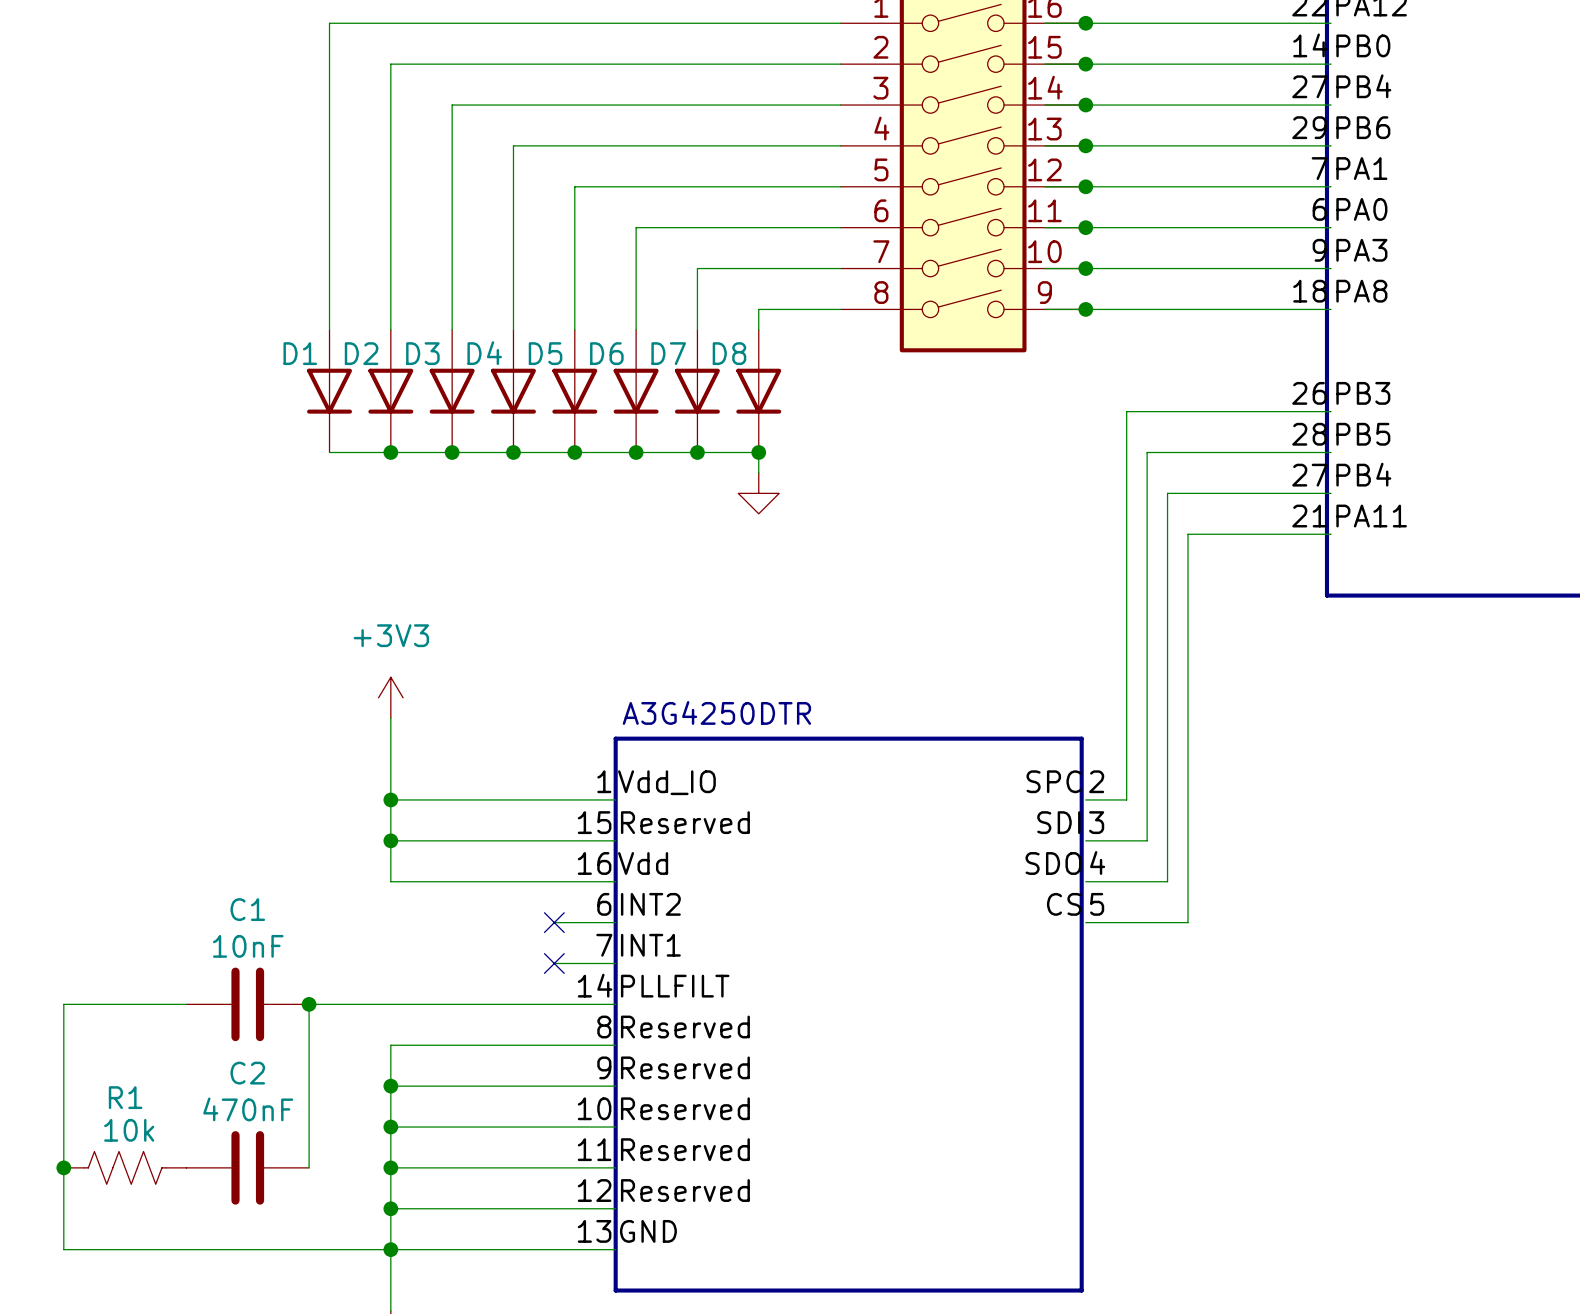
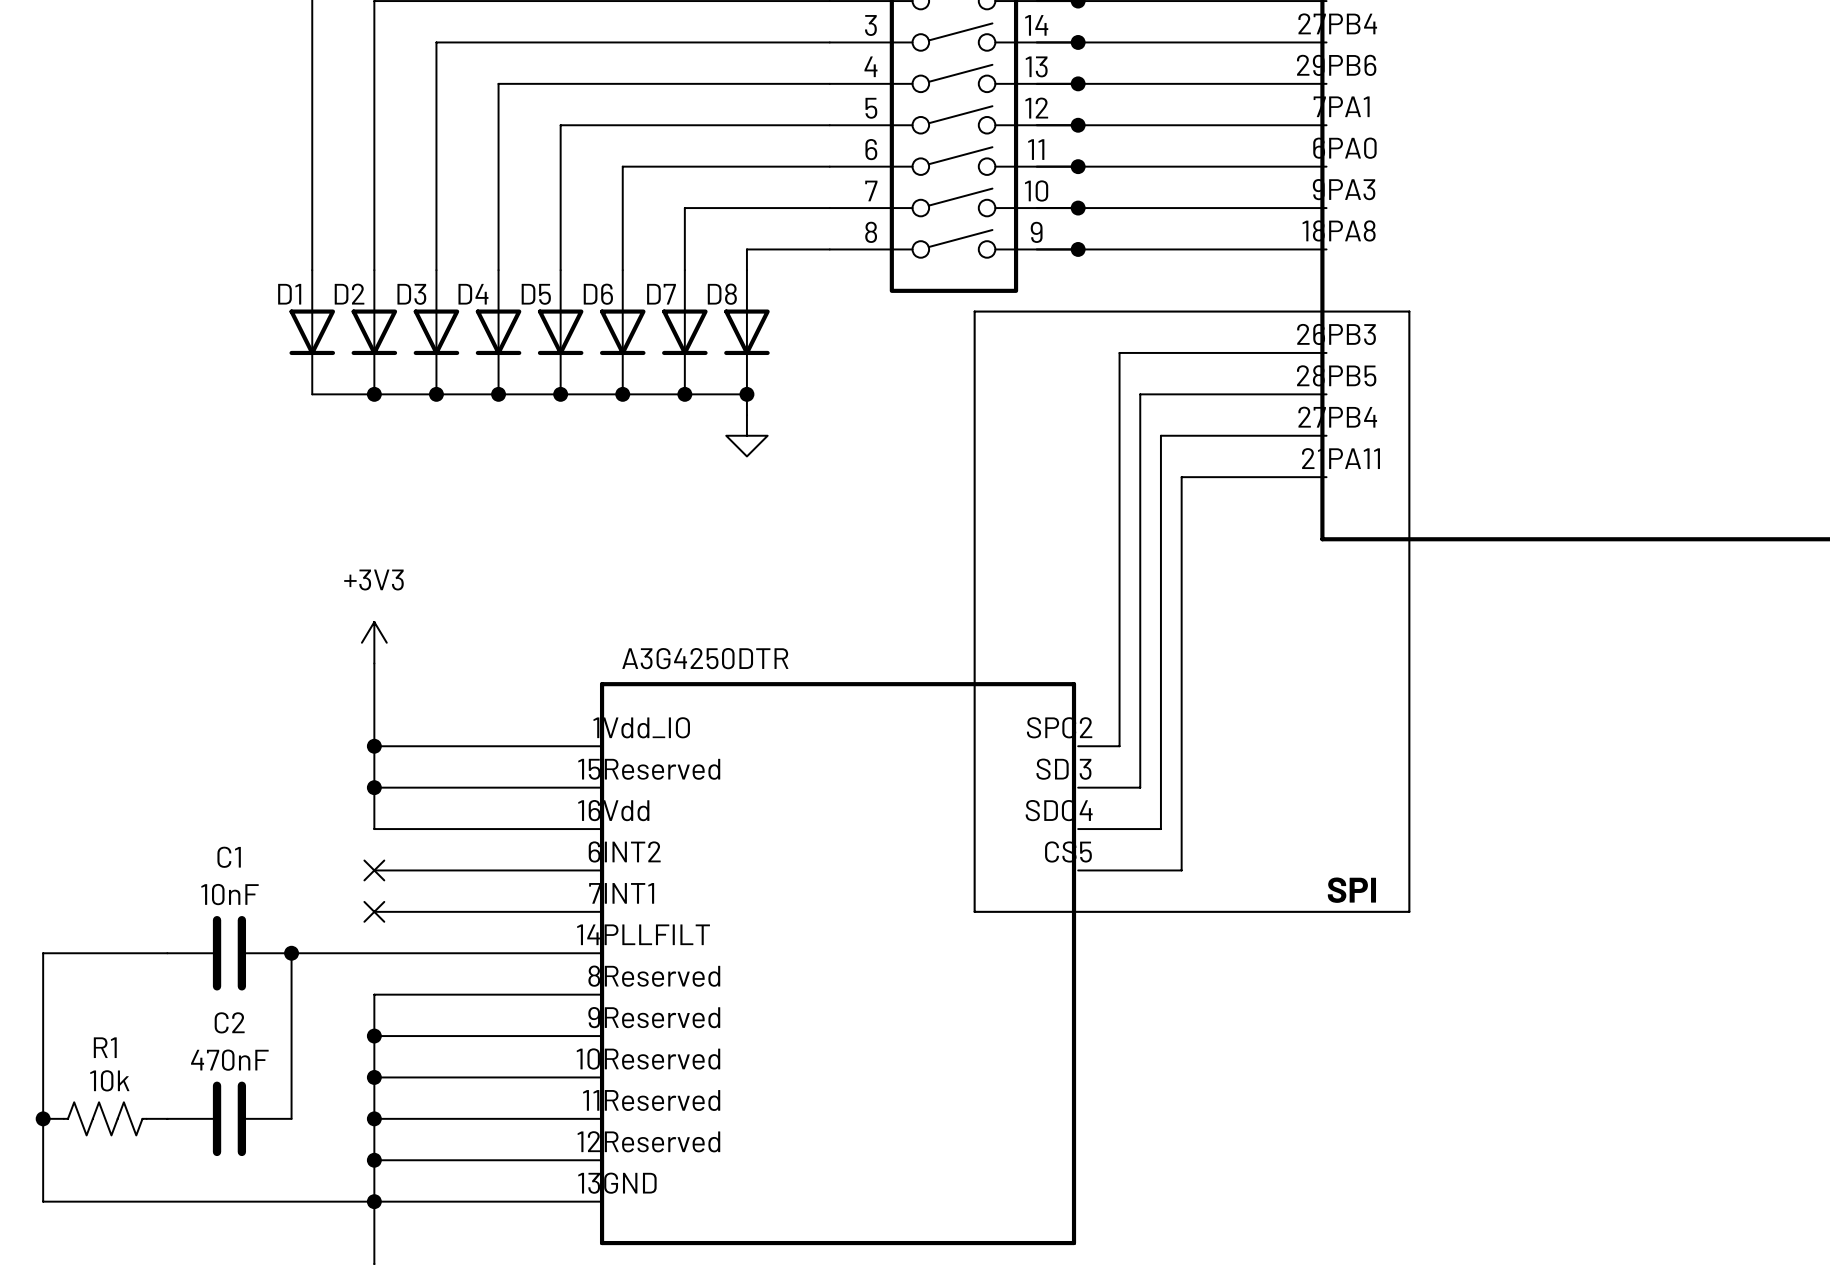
line: none -> (974, 311) (1409, 311) (1409, 911) (974, 911) (974, 311)
wire: none -> (374, 870) (539, 870)
no-connect mark: none -> (374, 870)
no-connect mark: (554, 922) -> none
label: none -> SPI (1351, 890)
wire: none -> (374, 911) (539, 911)
no-connect mark: none -> (374, 911)
no-connect mark: (554, 963) -> none

